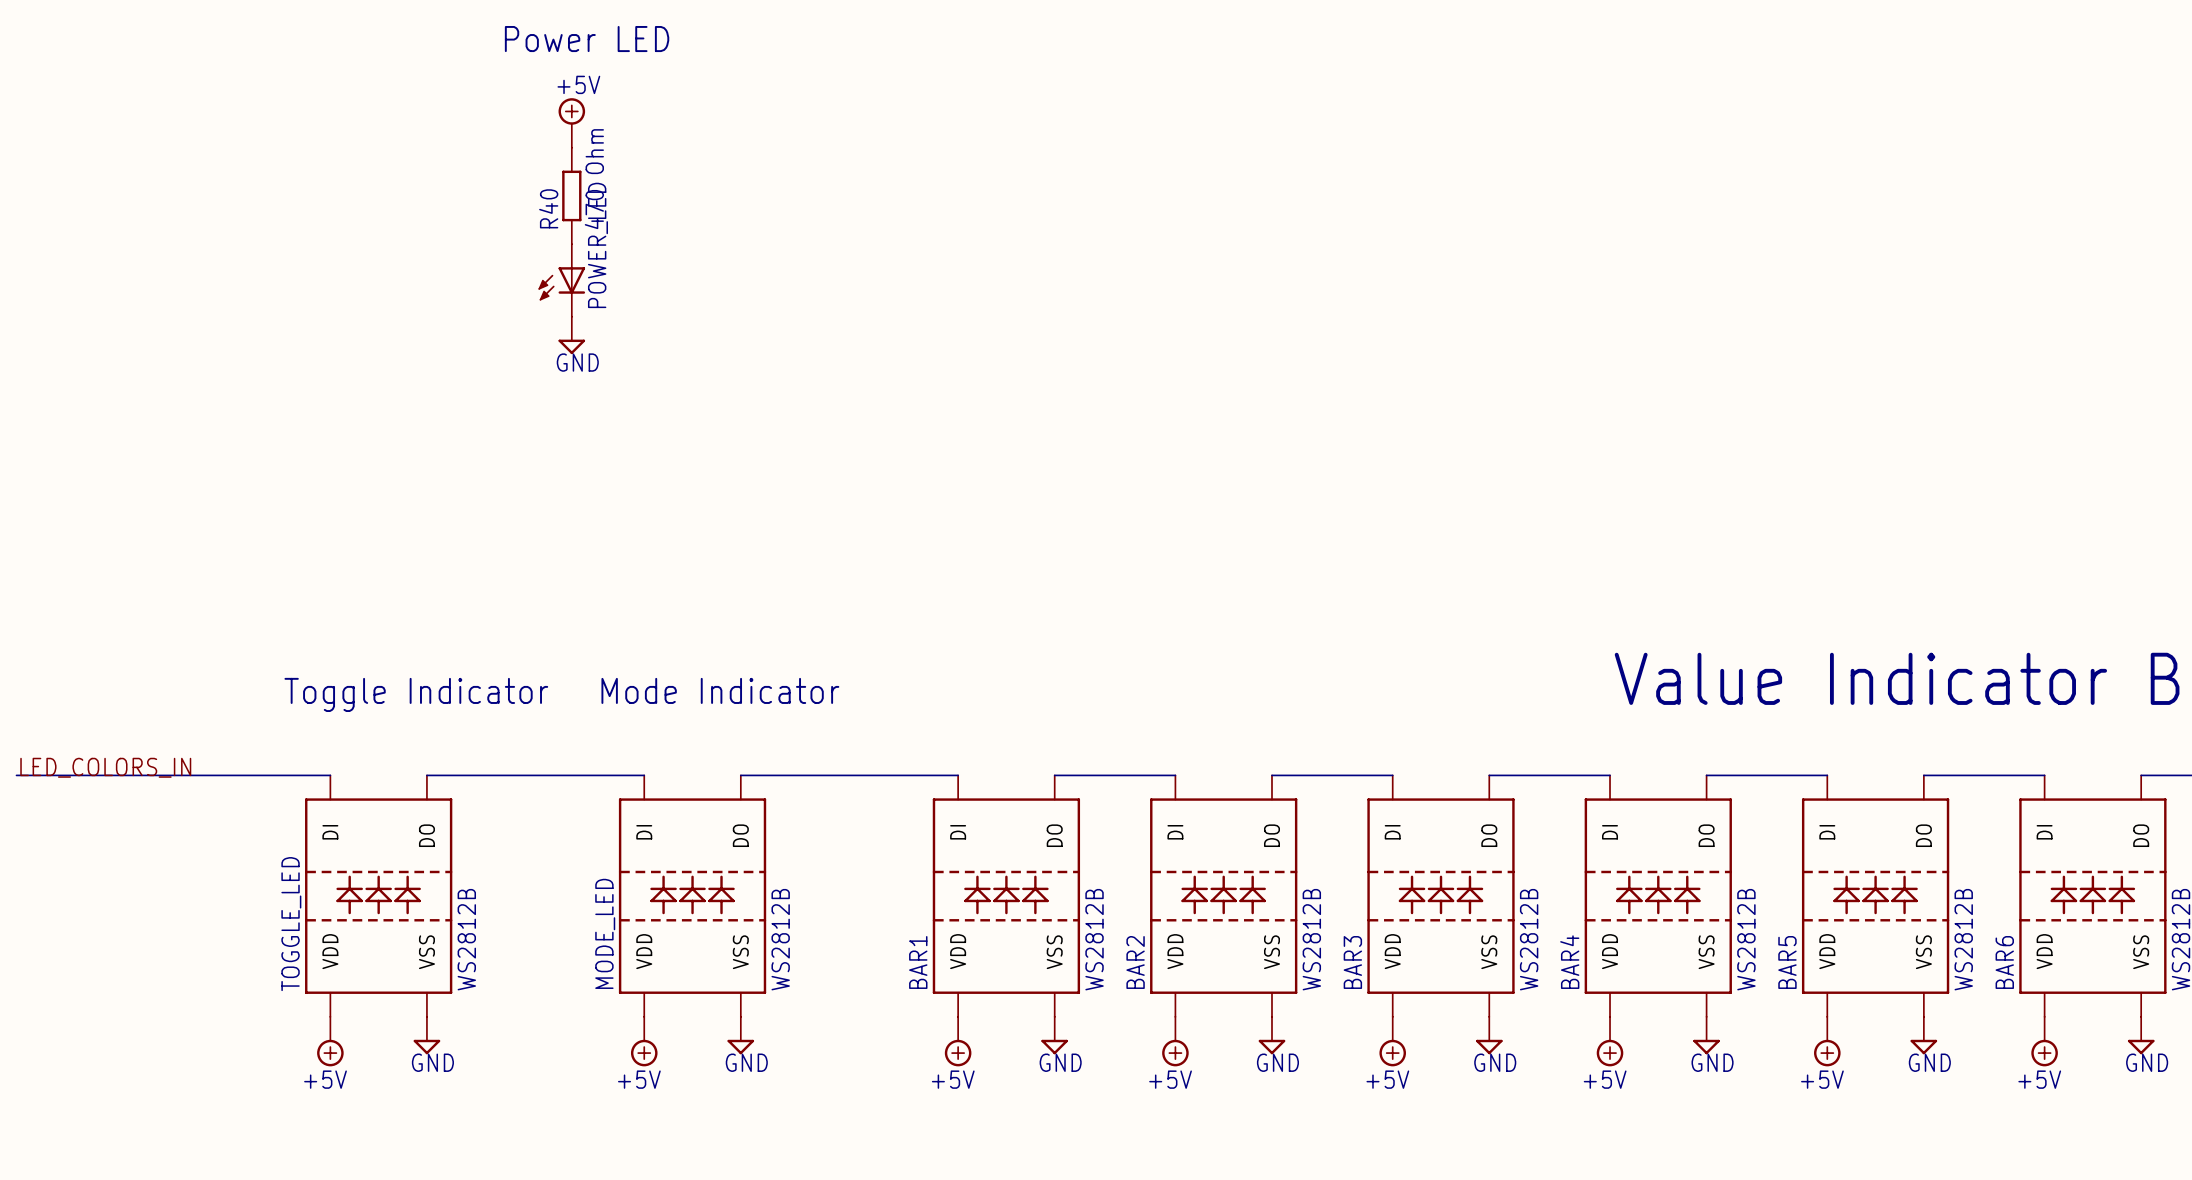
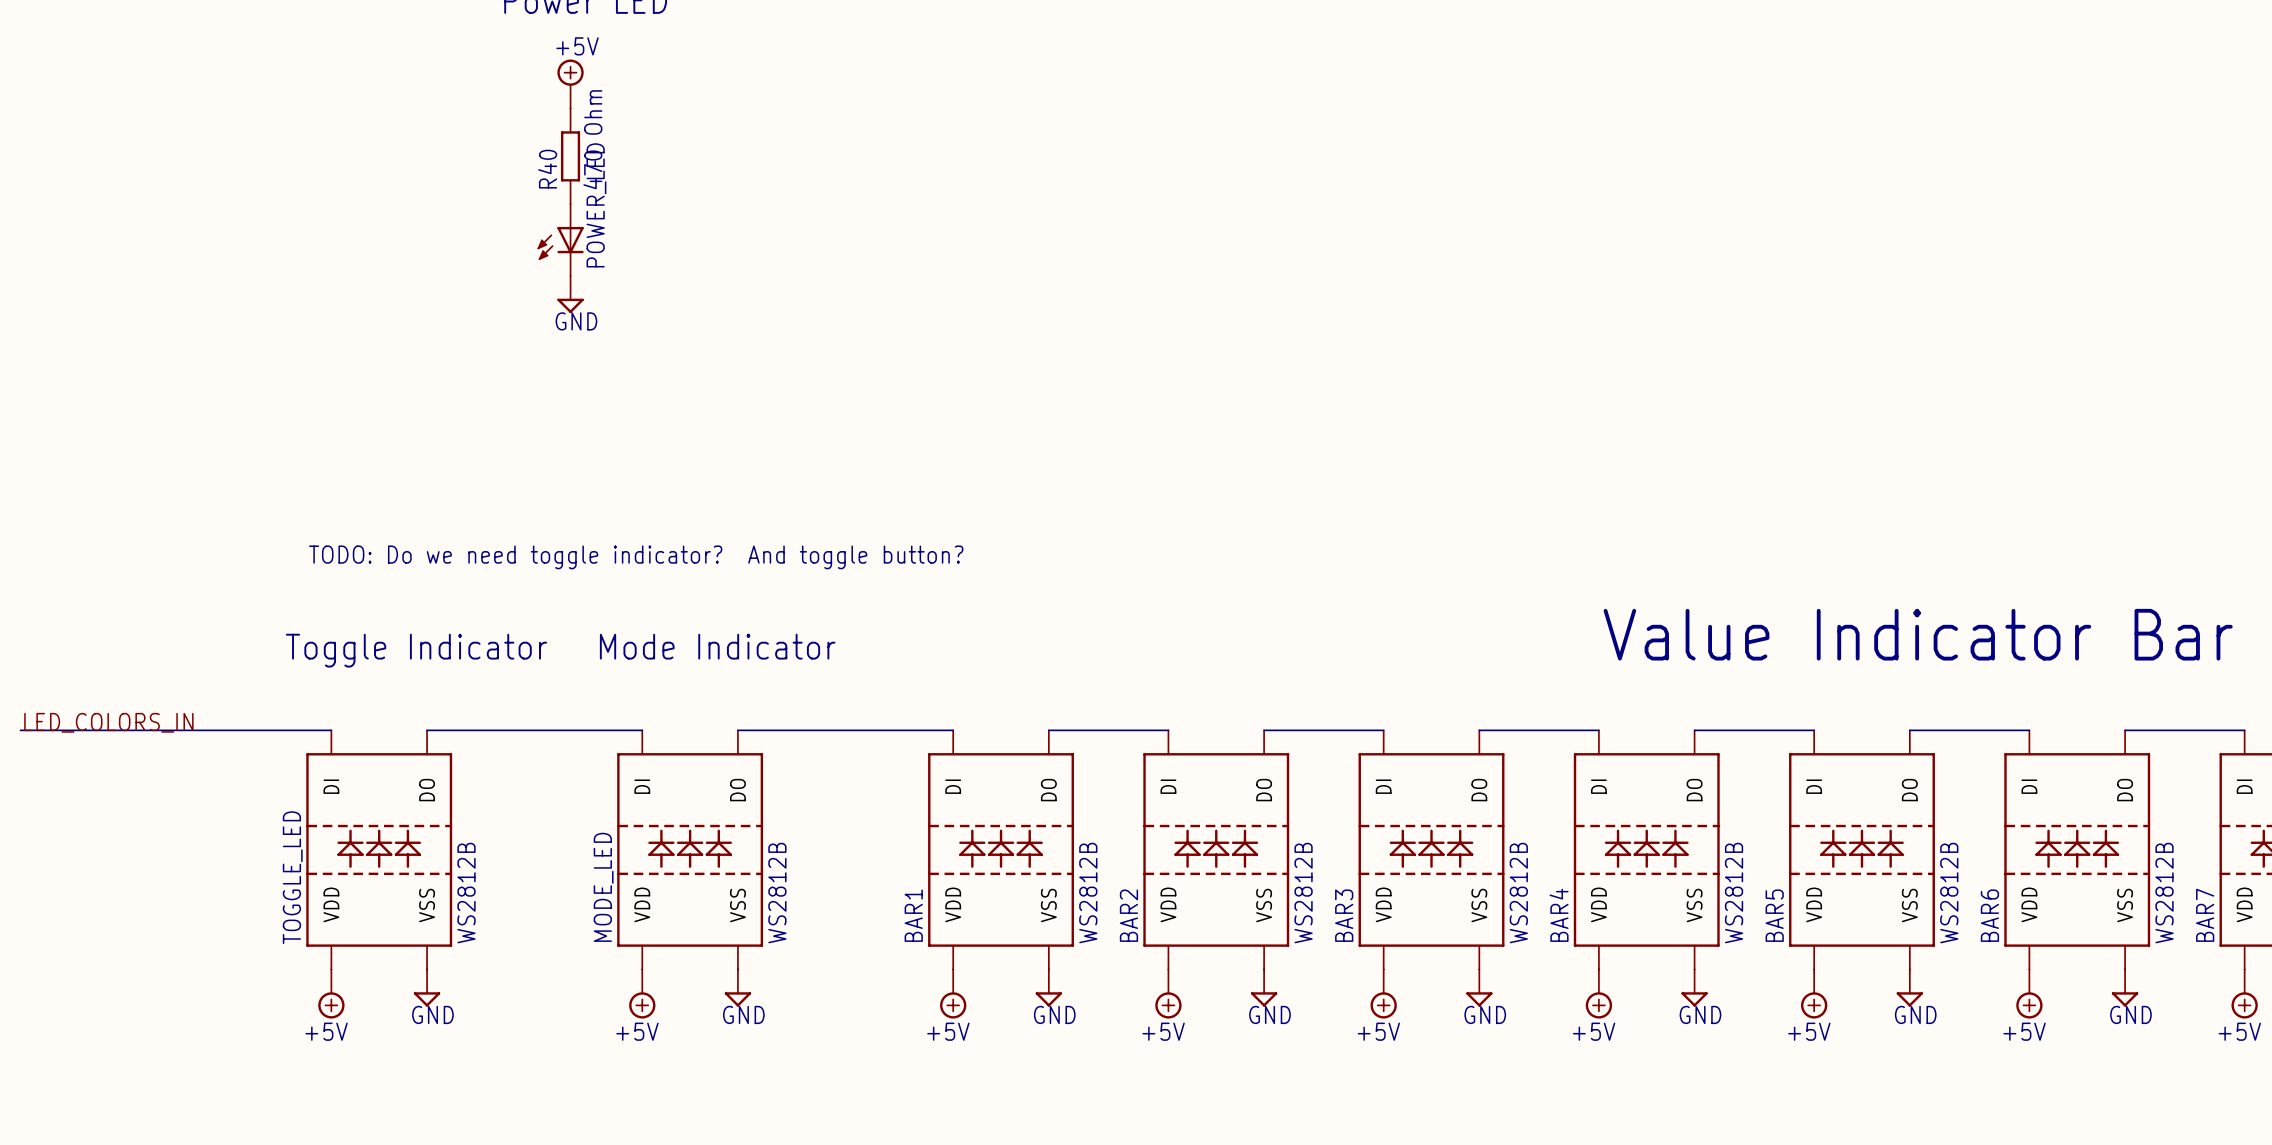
text: none -> TODO: Do we need toggle indicator? And toggle button? (636, 557)

